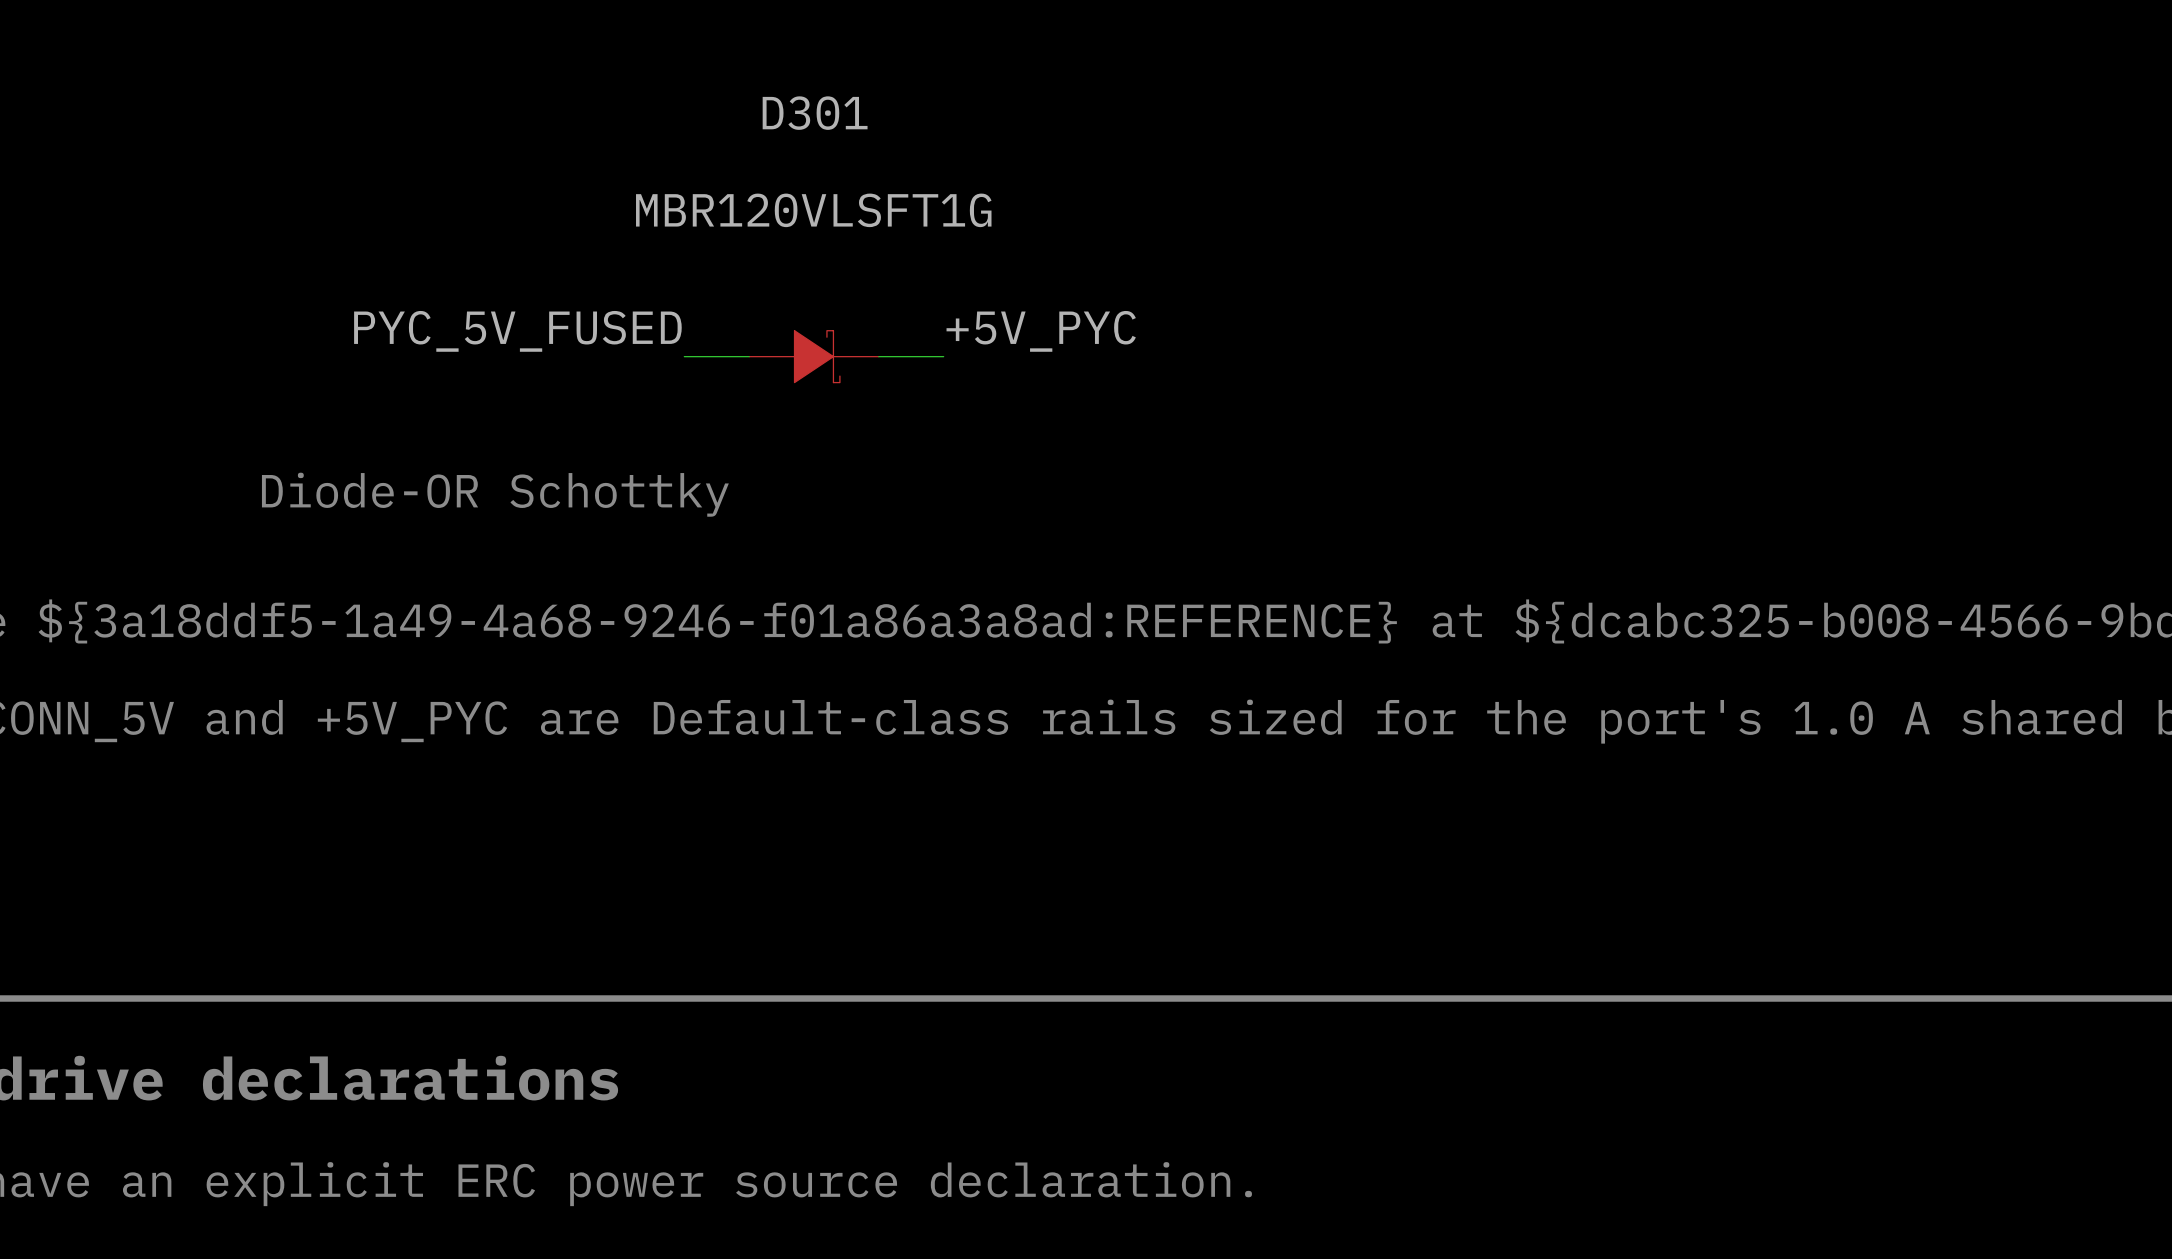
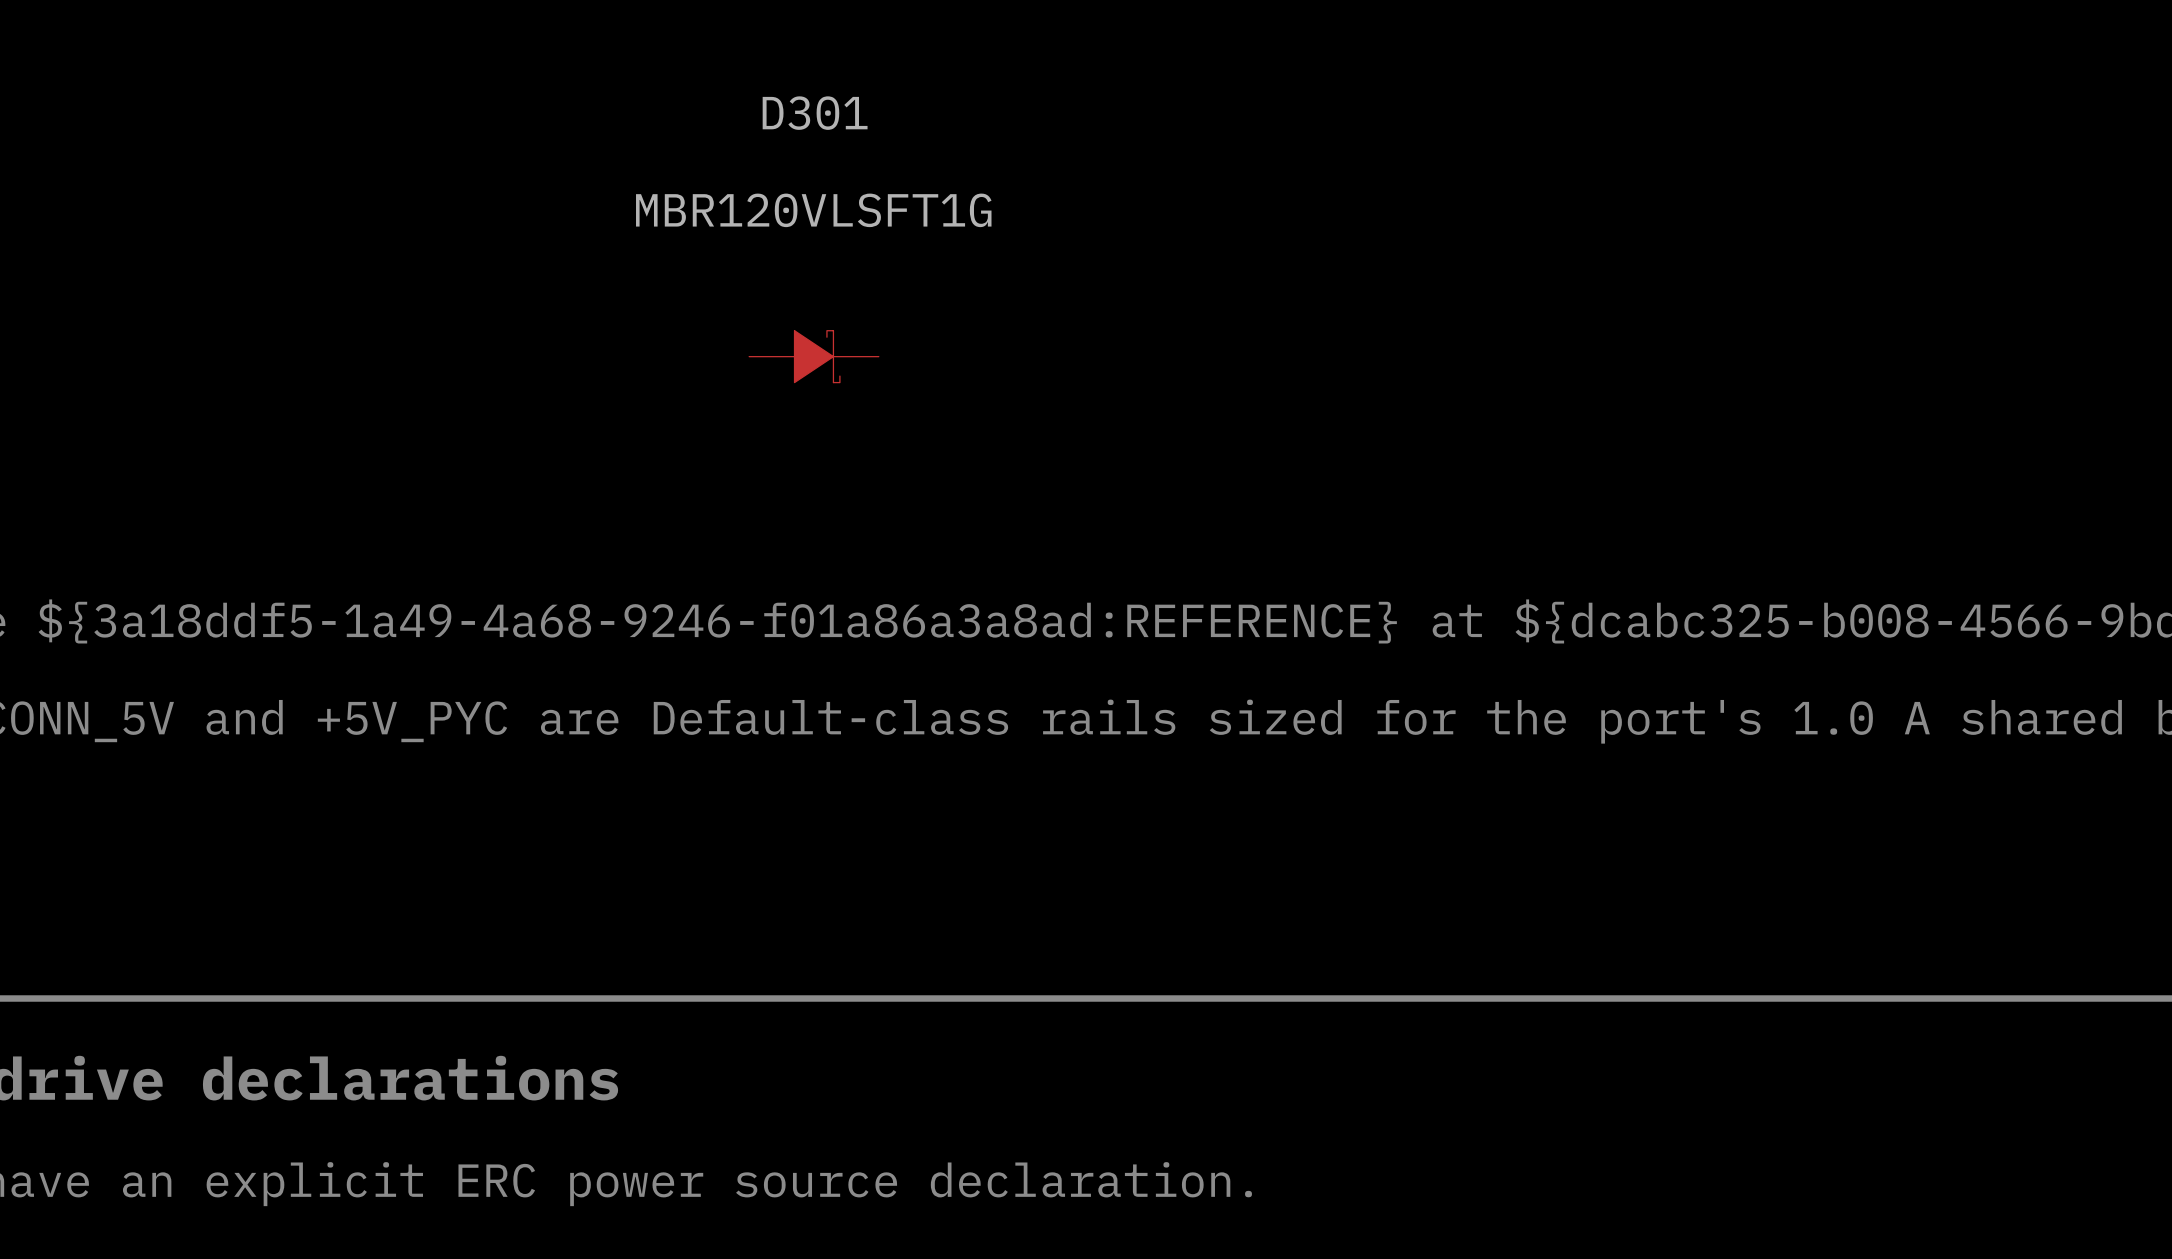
label: PYC_5V_FUSED (517, 331) -> none
label: +5V_PYC (1041, 331) -> none
wire: (684, 356) (749, 356) -> none
wire: (878, 356) (943, 356) -> none
text: Diode-OR Schottky (495, 494) -> none

